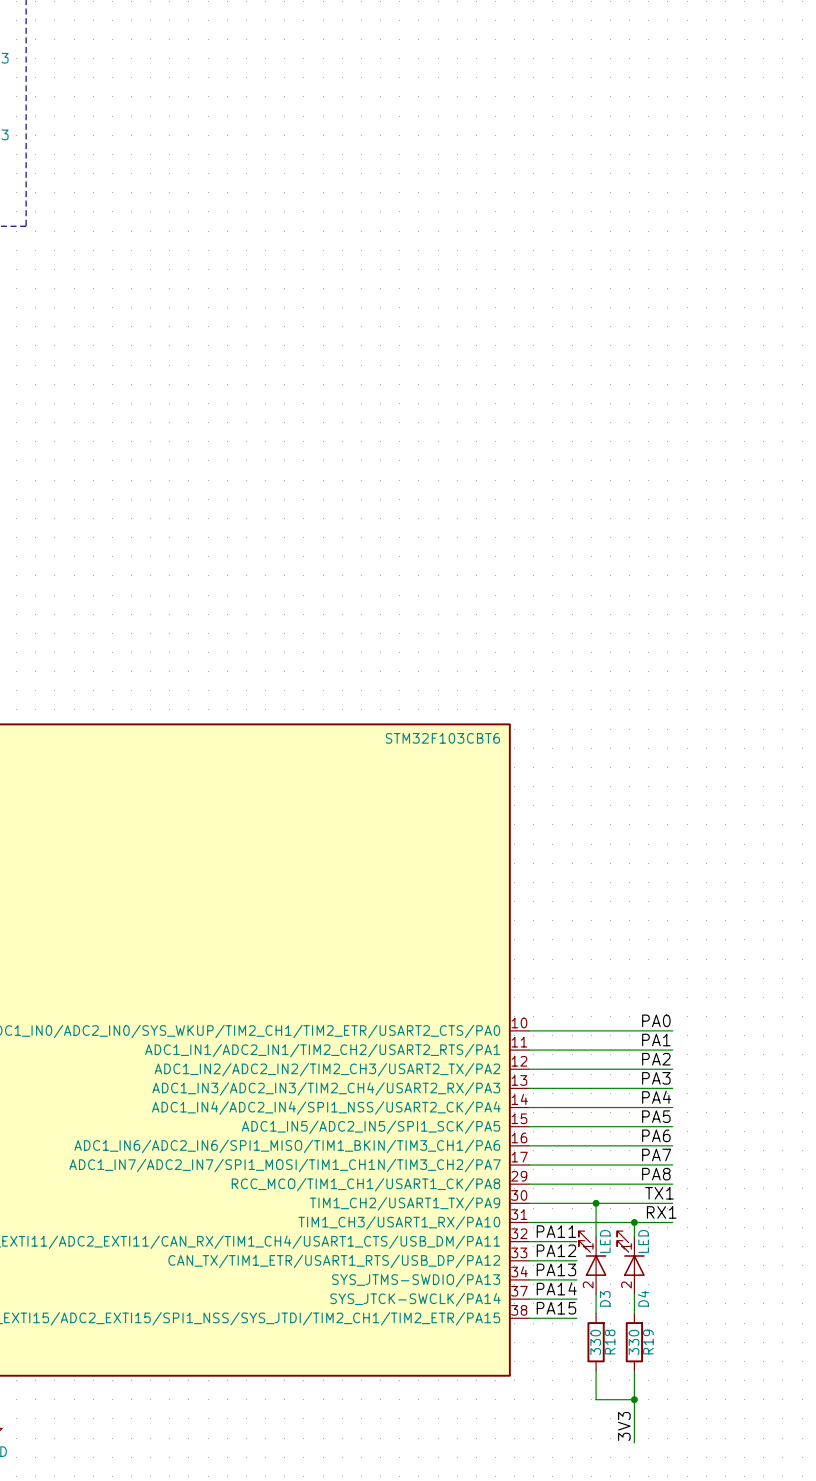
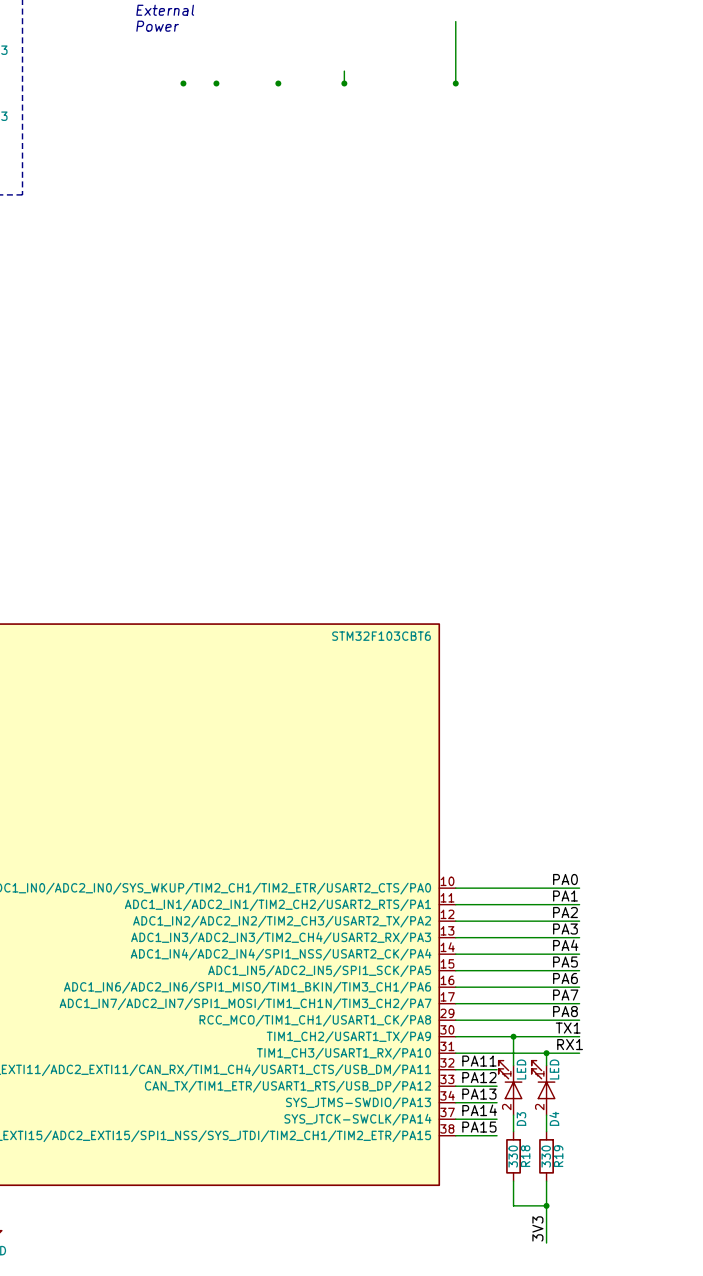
text: none -> External (165, 10)
wire: none -> (455, 21) (455, 83)
text: none -> Power (157, 26)
wire: none -> (344, 71) (344, 83)
junction: none -> (183, 83)
junction: none -> (216, 83)
junction: none -> (278, 83)
junction: none -> (344, 83)
junction: none -> (455, 83)

